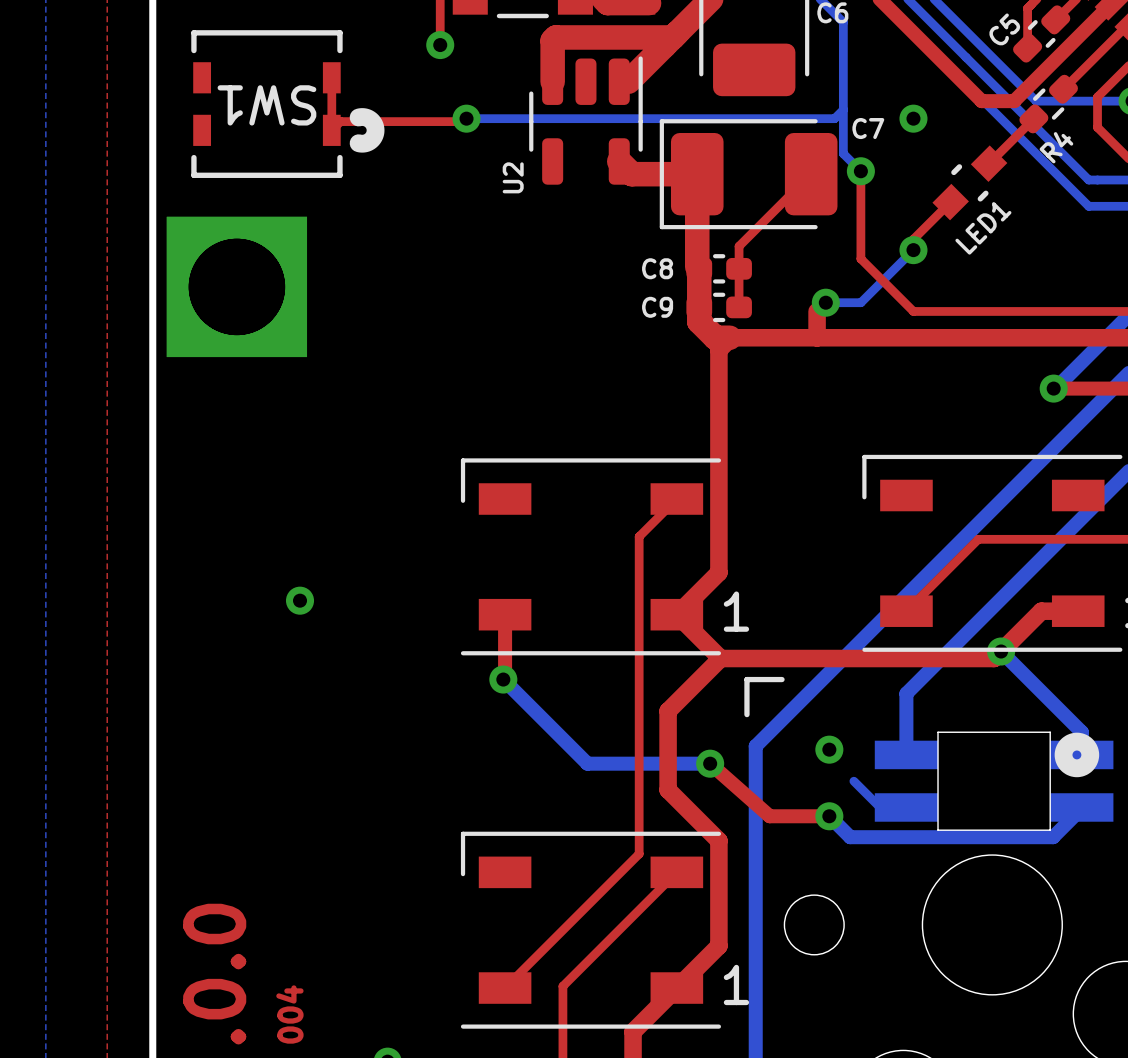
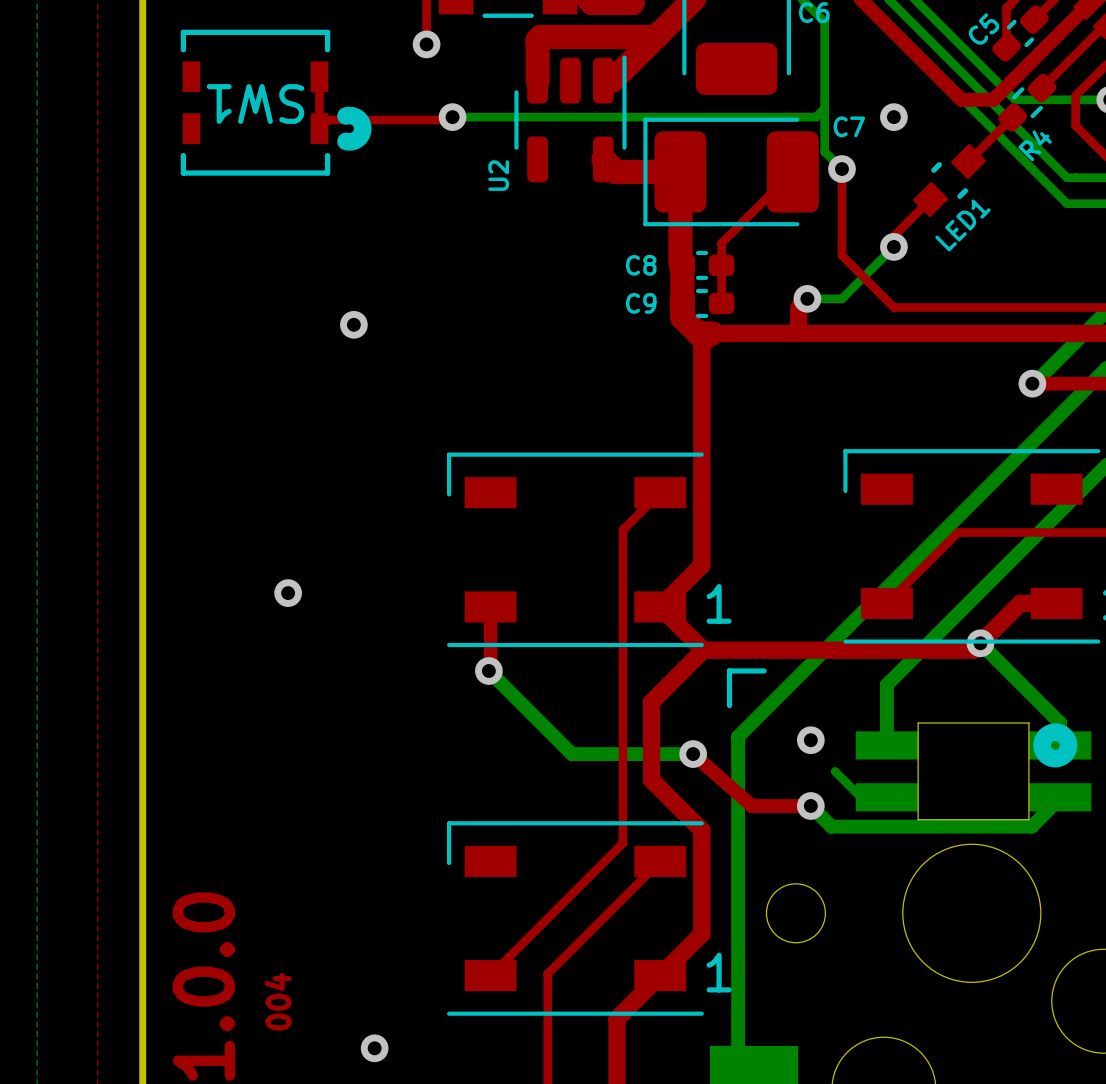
part: (236, 286) -> none
via: none -> (353, 324)

